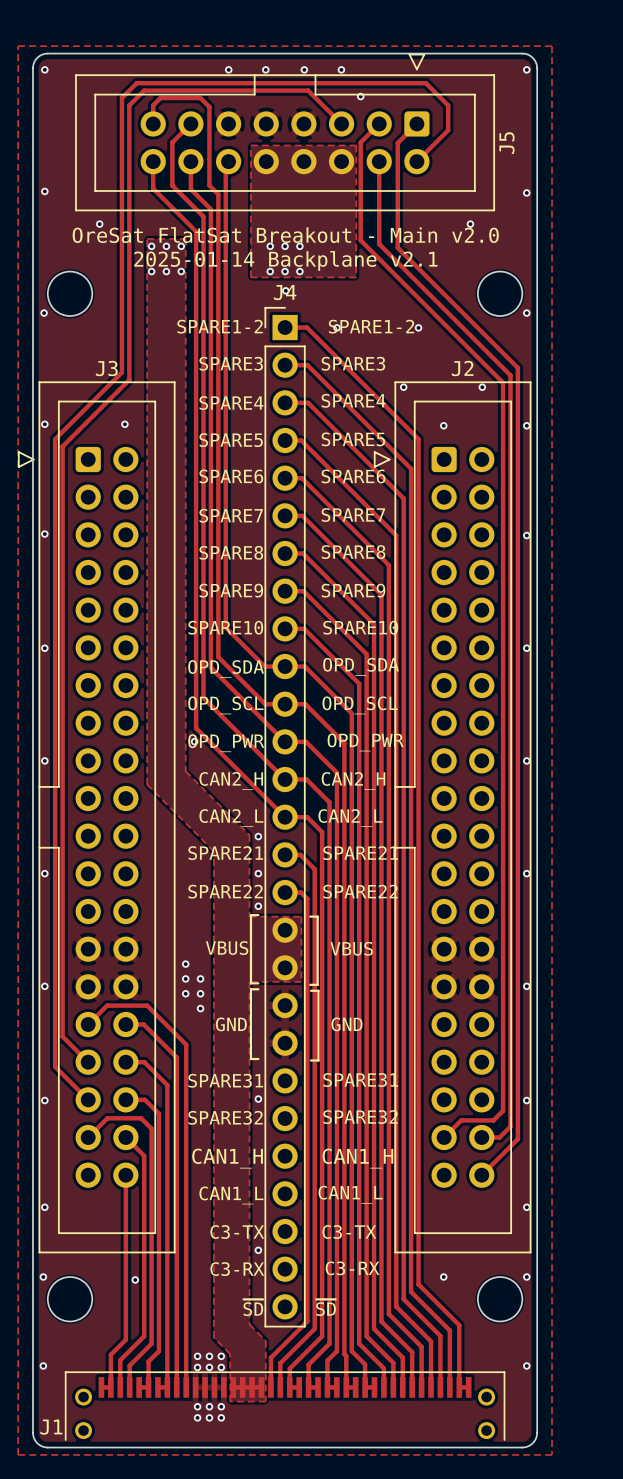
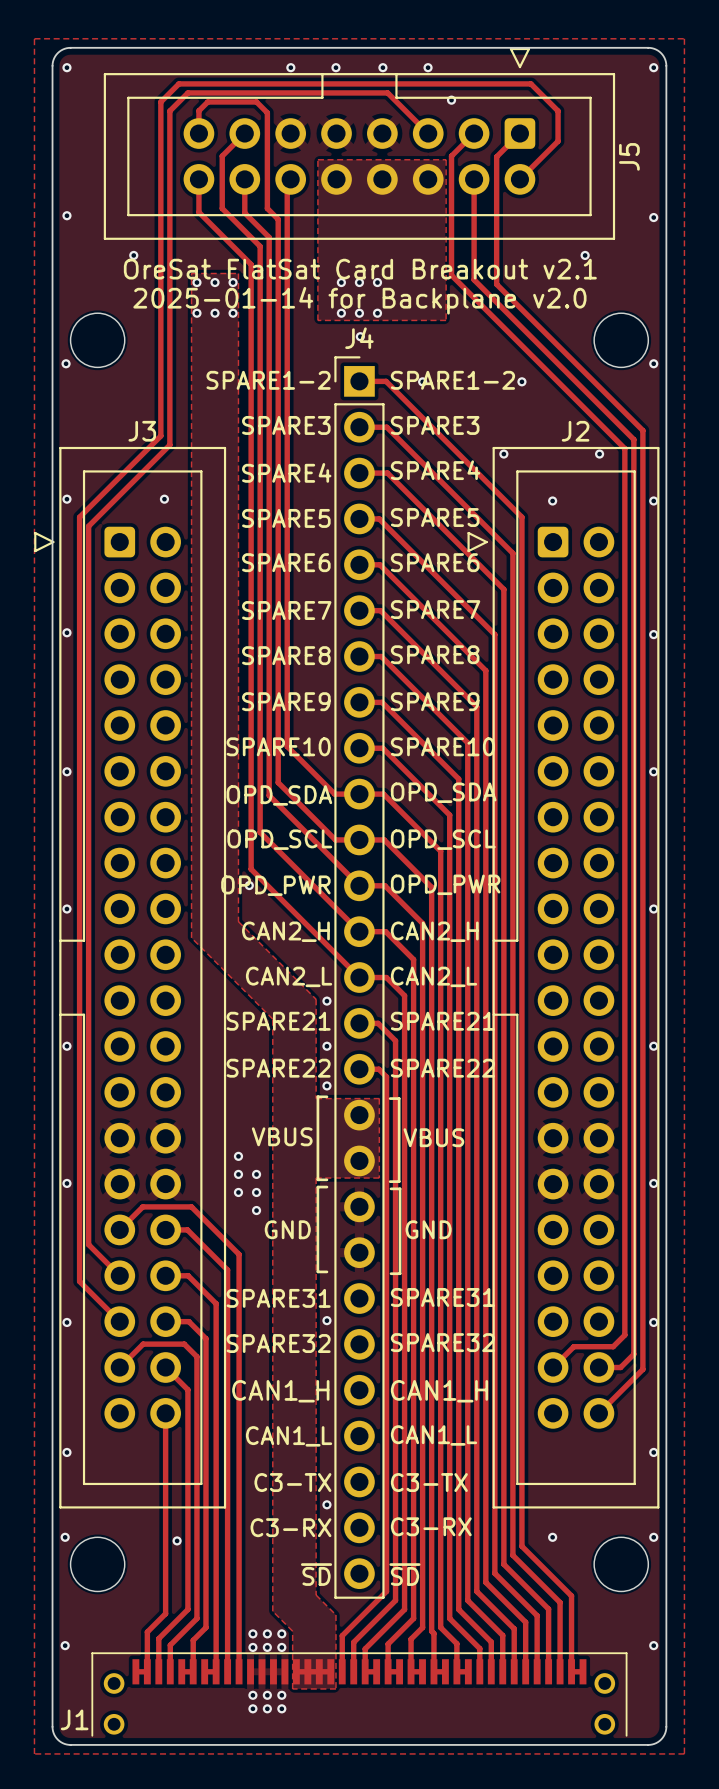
text: OreSat FlatSat Breakout - Main v2.0 (285, 235) -> OreSat FlatSat Card Breakout v2.1 (360, 269)
text: 2025-01-14 Backplane v2.1 (285, 260) -> 2025-01-14 for Backplane v2.0 (359, 300)

